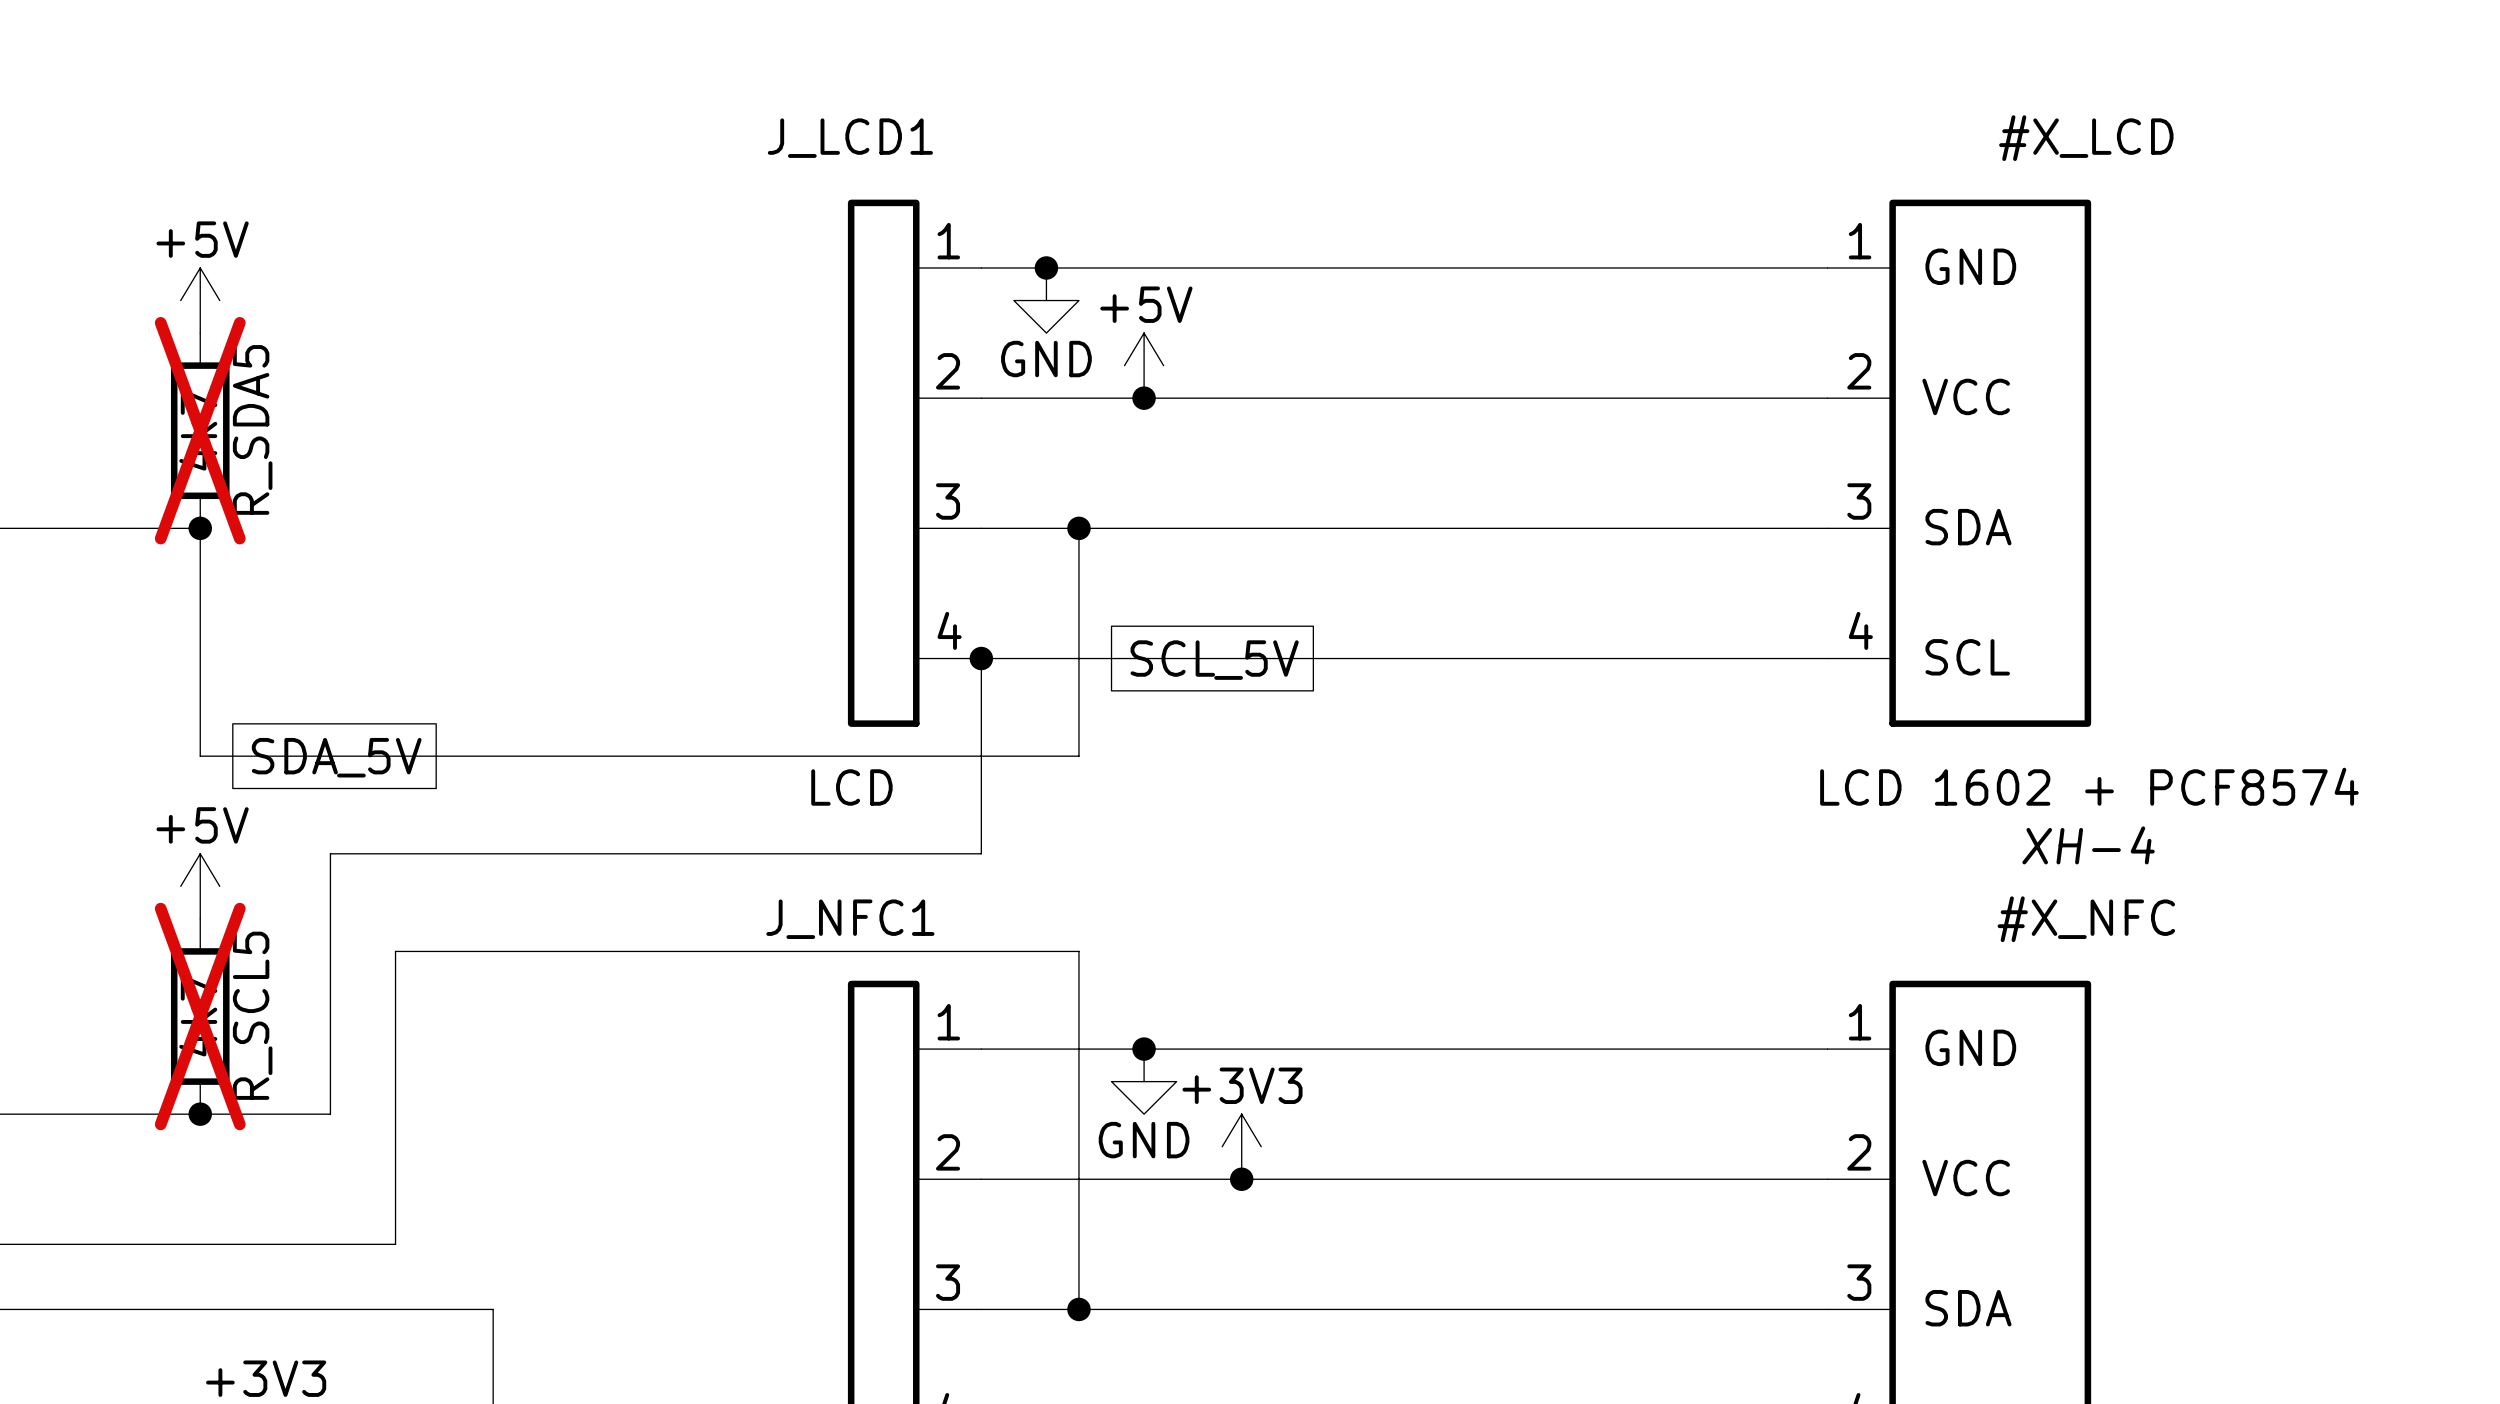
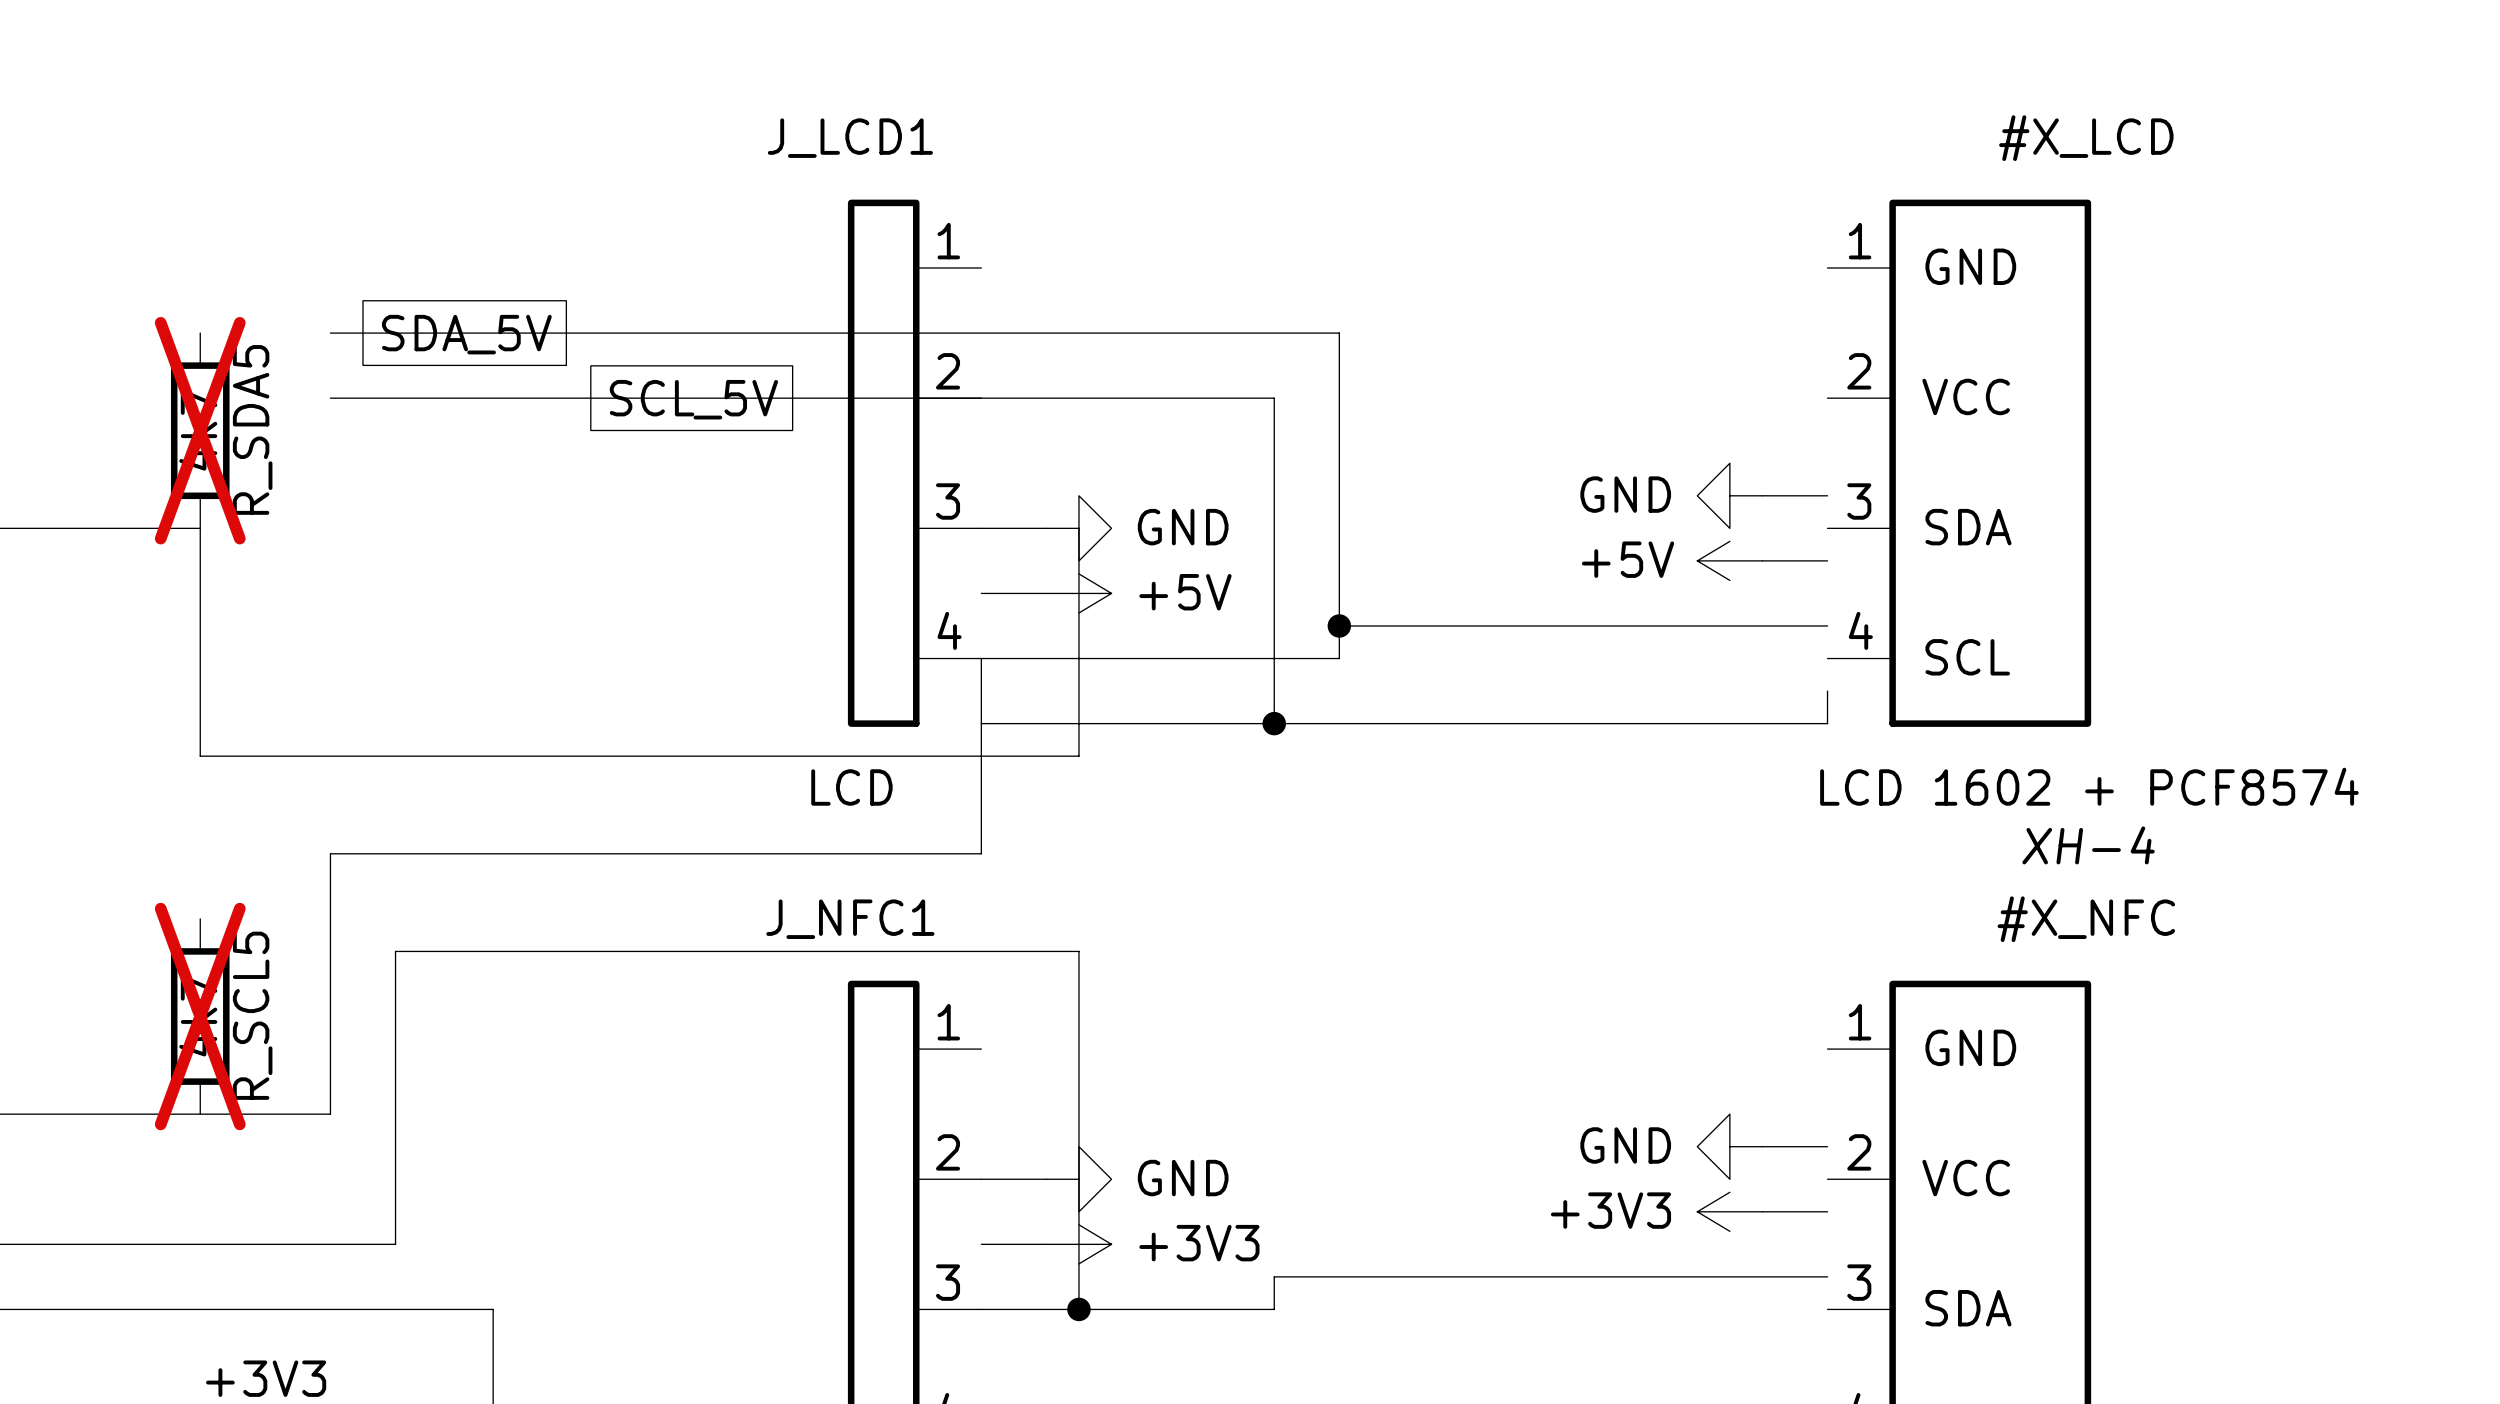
wire: (981, 267) (1827, 267) -> none
junction: (1046, 267) -> none
power symbol: +5V (200, 300) -> none
power symbol rotation: 0° (1046, 300) -> 90° counterclockwise (1078, 528)
power symbol position: GND (1046, 300) -> GND (1078, 528)
power symbol text position: +5V (1146, 304) -> +5V (1185, 592)
power symbol text position: GND (1046, 359) -> GND (1183, 527)
power symbol rotation: 0° (1144, 365) -> 90° clockwise (1078, 593)
power symbol position: +5V (1144, 365) -> +5V (1078, 593)
wire: none -> (330, 398) (981, 398)
junction: (1144, 398) -> none
wire: (1274, 398) (1827, 398) -> (1274, 398) (1274, 723)
power symbol: none -> GND (1729, 495)
wire: none -> (1762, 495) (1827, 495)
junction: (200, 528) -> none
wire: (1046, 528) (1827, 528) -> none
junction: (1078, 528) -> none
power symbol: none -> +5V (1729, 560)
wire: none -> (1762, 560) (1827, 560)
wire: none -> (981, 593) (1046, 593)
wire: none -> (1339, 625) (1827, 625)
junction: none -> (1339, 625)
junction: (981, 658) -> none
wire: (1339, 658) (1827, 658) -> (1339, 658) (1339, 333) (330, 333)
global label position: SCL_5V (1214, 660) -> SCL_5V (693, 399)
wire: none -> (1827, 691) (1827, 723) (981, 723)
junction: none -> (1274, 723)
global label position: SDA_5V (336, 757) -> SDA_5V (466, 334)
power symbol: +5V (200, 886) -> none
wire: (981, 1049) (1827, 1049) -> none
junction: (1144, 1049) -> none
power symbol rotation: 0° (1144, 1081) -> 90° counterclockwise (1078, 1179)
power symbol position: GND (1144, 1081) -> GND (1078, 1179)
power symbol text position: +3V3 (1242, 1085) -> +3V3 (1199, 1243)
junction: (200, 1114) -> none
power symbol text position: GND (1144, 1140) -> GND (1183, 1178)
power symbol rotation: 0° (1241, 1146) -> 90° clockwise (1078, 1244)
power symbol position: +3V3 (1241, 1146) -> +3V3 (1078, 1244)
power symbol: none -> GND (1729, 1146)
wire: none -> (1762, 1146) (1827, 1146)
wire: (1046, 1179) (1827, 1179) -> none
junction: (1241, 1179) -> none
power symbol: none -> +3V3 (1729, 1211)
wire: none -> (1762, 1211) (1827, 1211)
wire: none -> (981, 1244) (1046, 1244)
wire: (1274, 1309) (1827, 1309) -> (1274, 1309) (1274, 1276) (1827, 1276)

